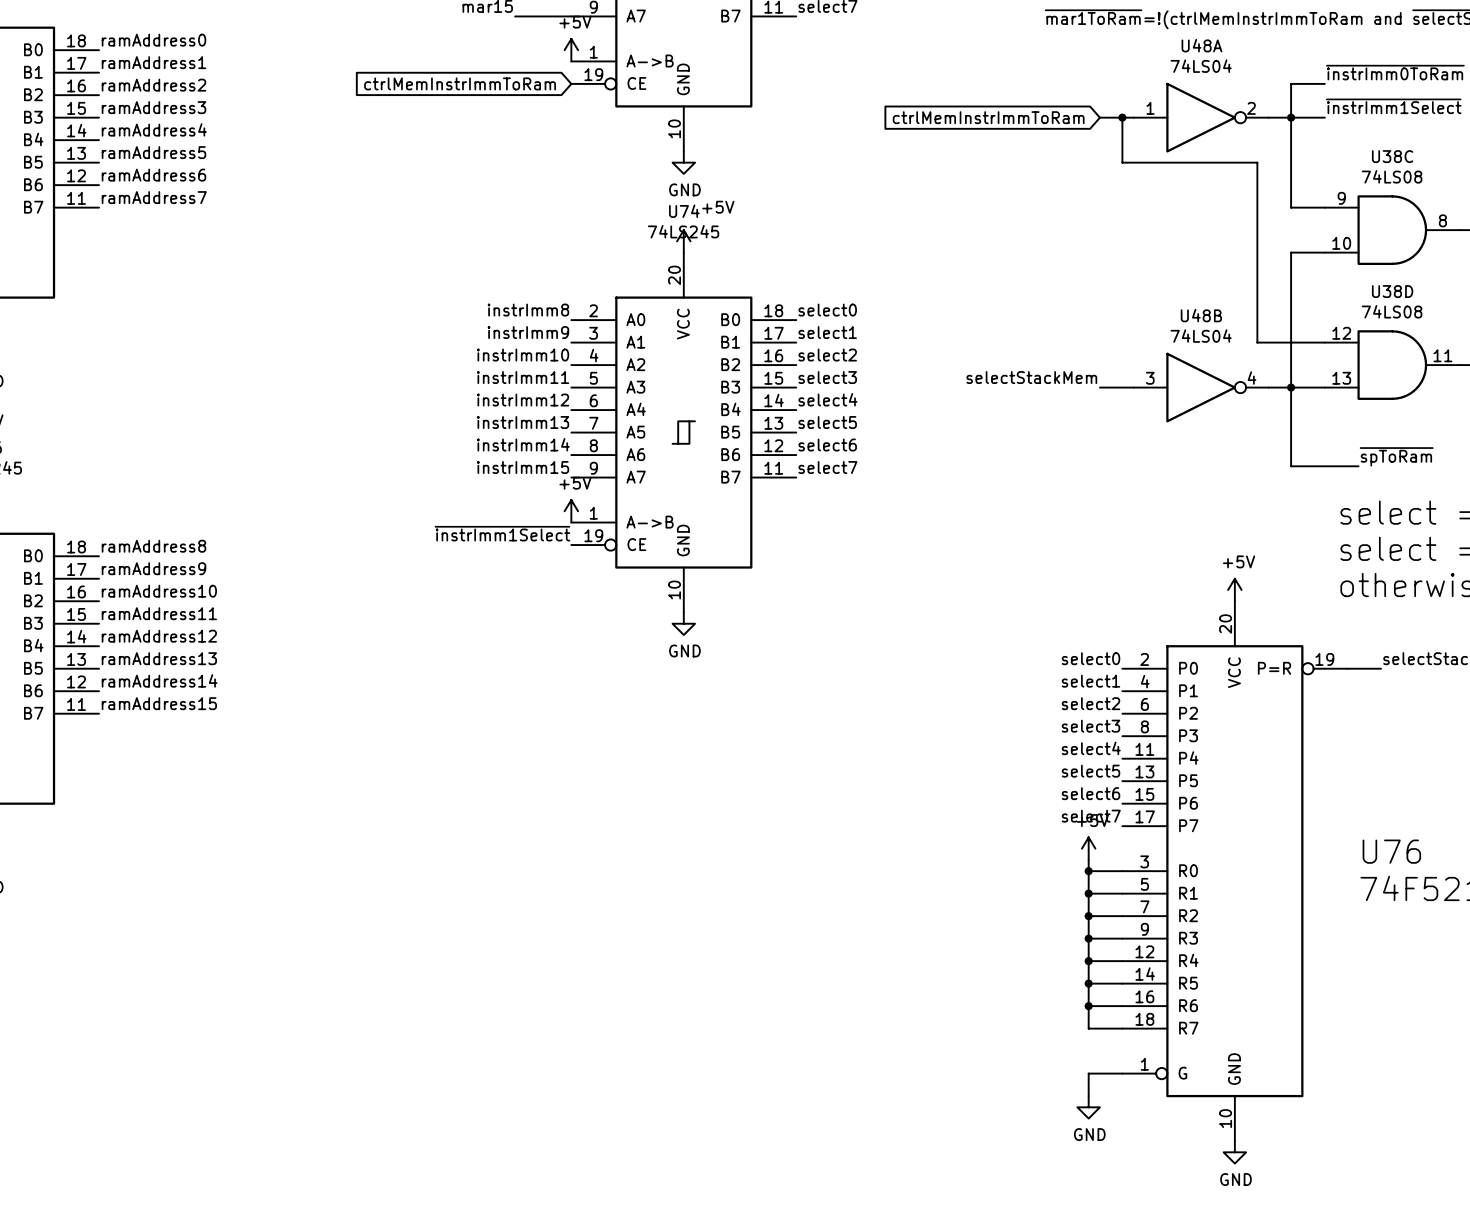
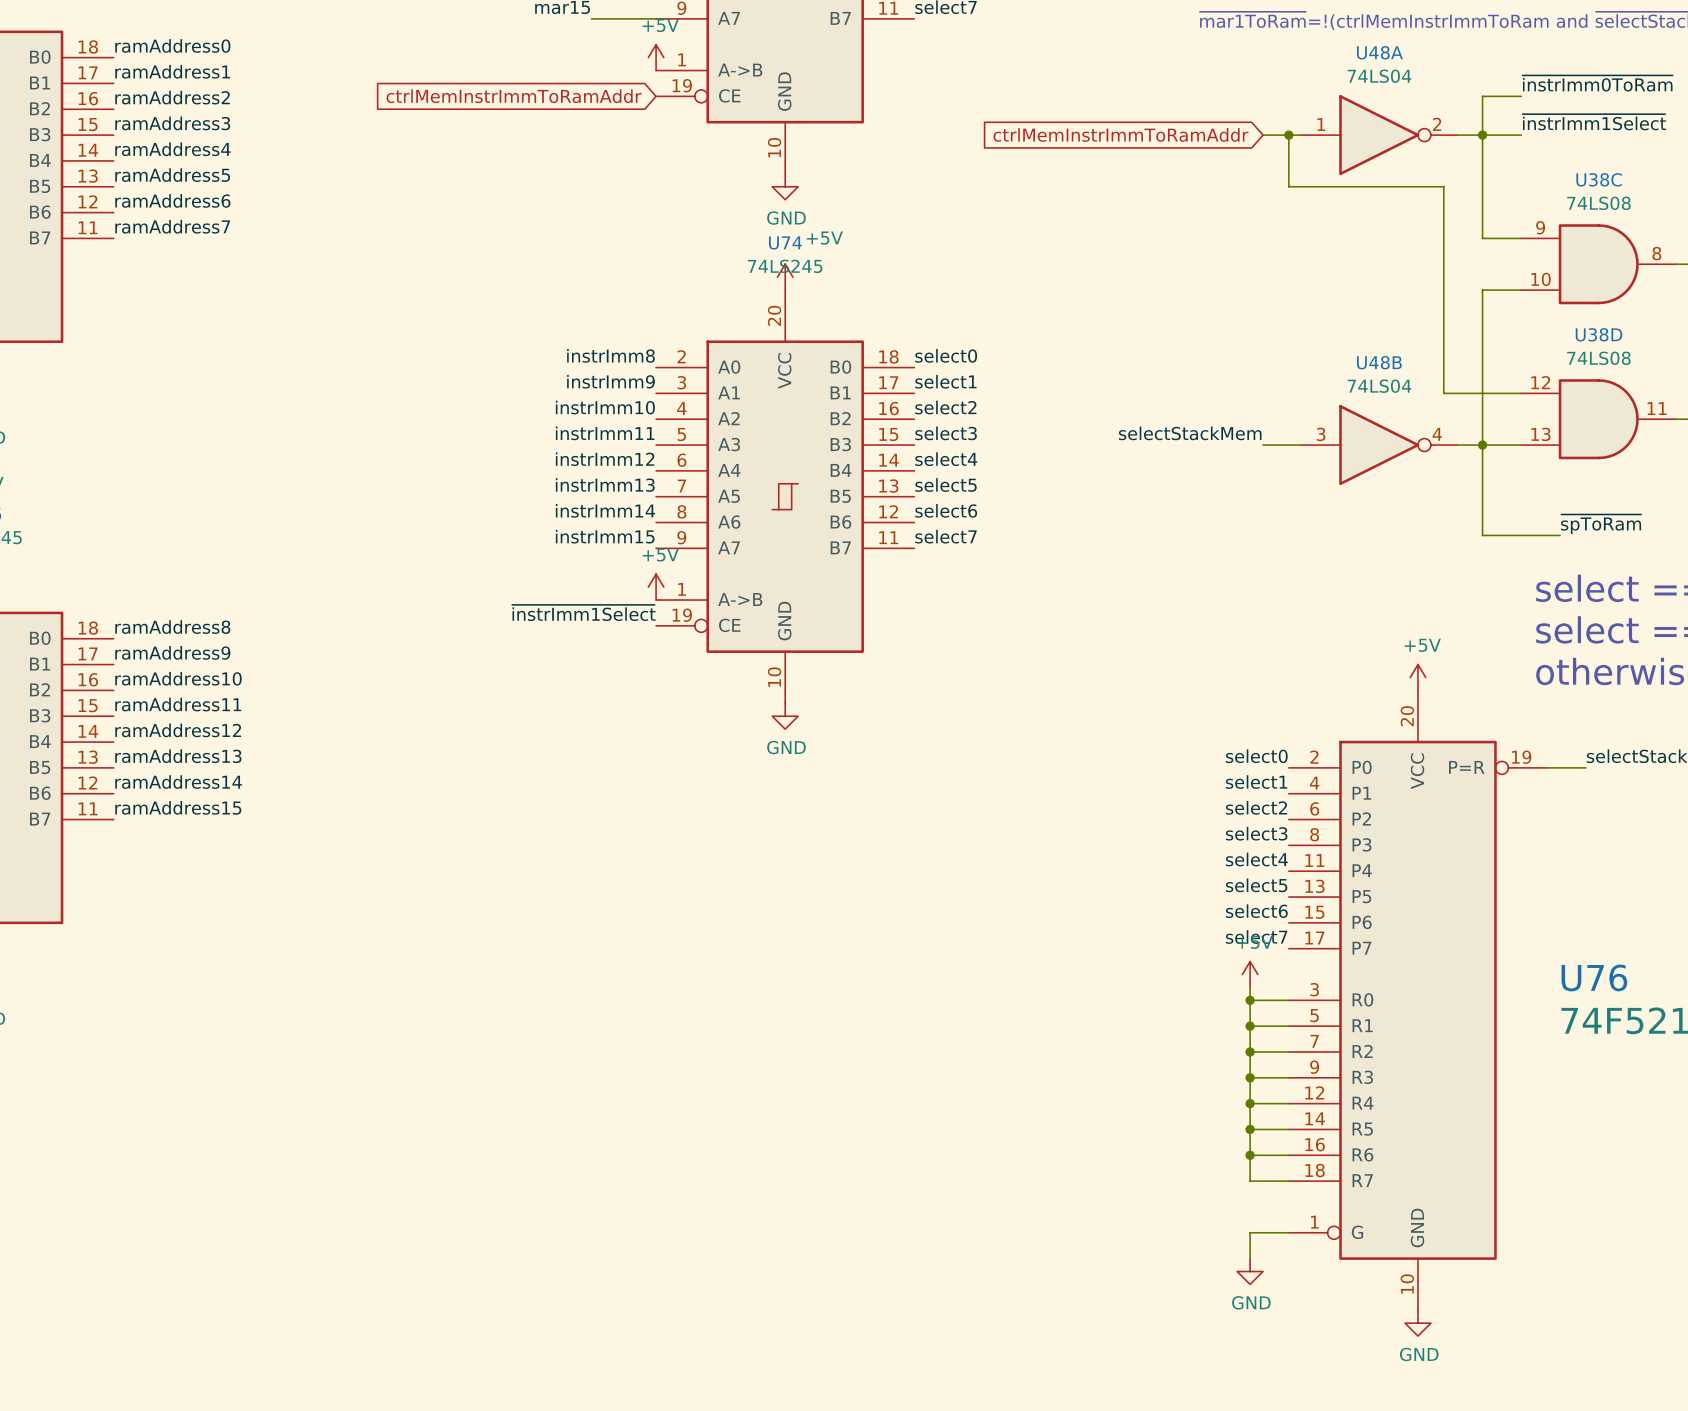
global label: ctrlMemInstrImmToRam (460, 83) -> ctrlMemInstrImmToRamAddr (514, 96)
global label: ctrlMemInstrImmToRam (988, 117) -> ctrlMemInstrImmToRamAddr (1121, 134)

